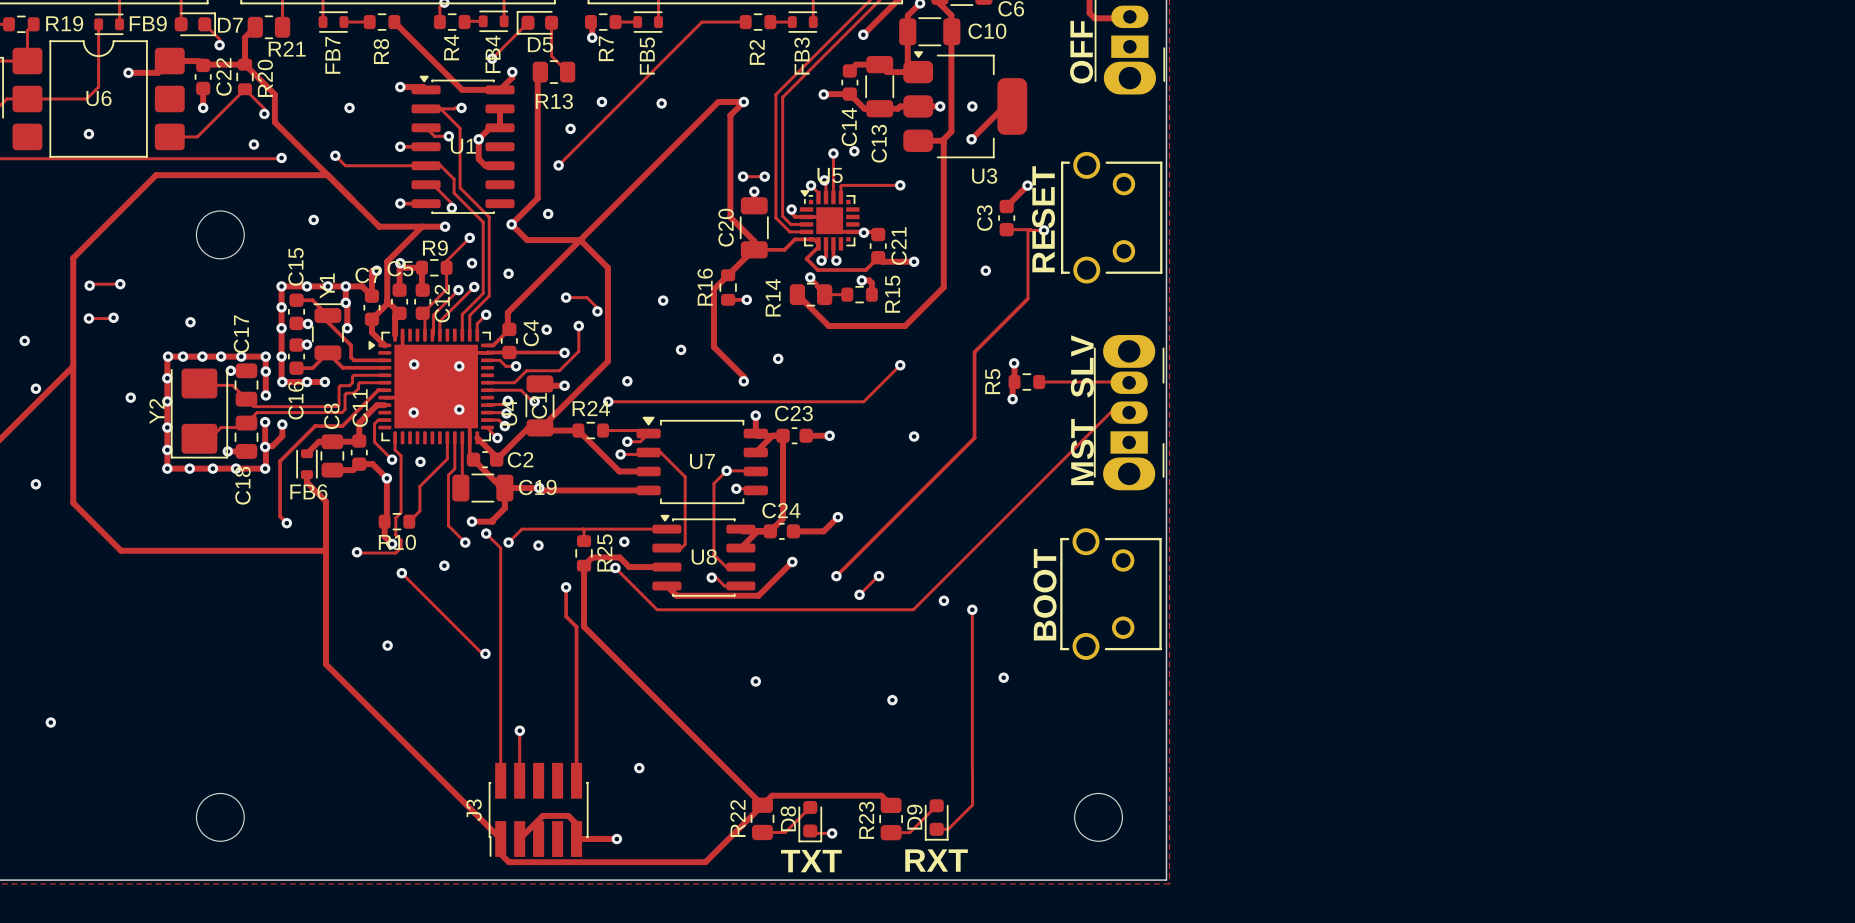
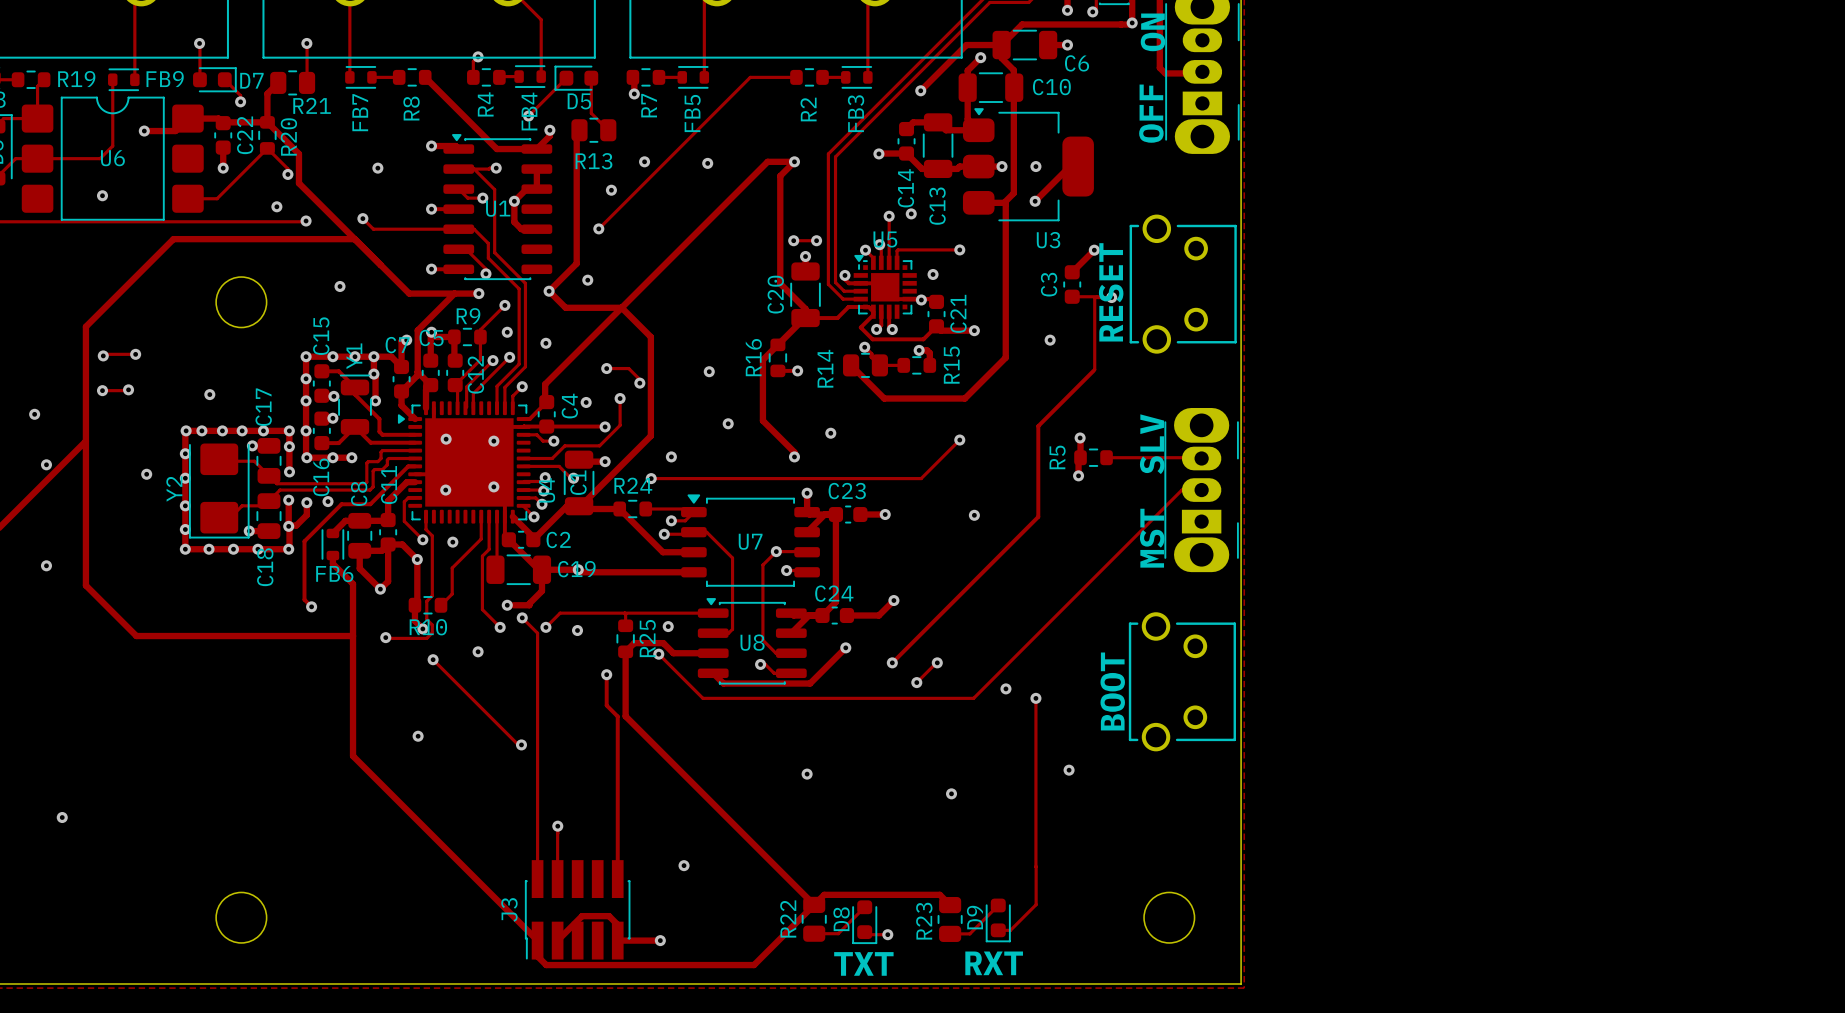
via: none -> (933, 274)
via: none -> (328, 501)
track: none -> (388, 544) (388, 581) (380, 589) (359, 568) (359, 550)
via: none -> (380, 589)

